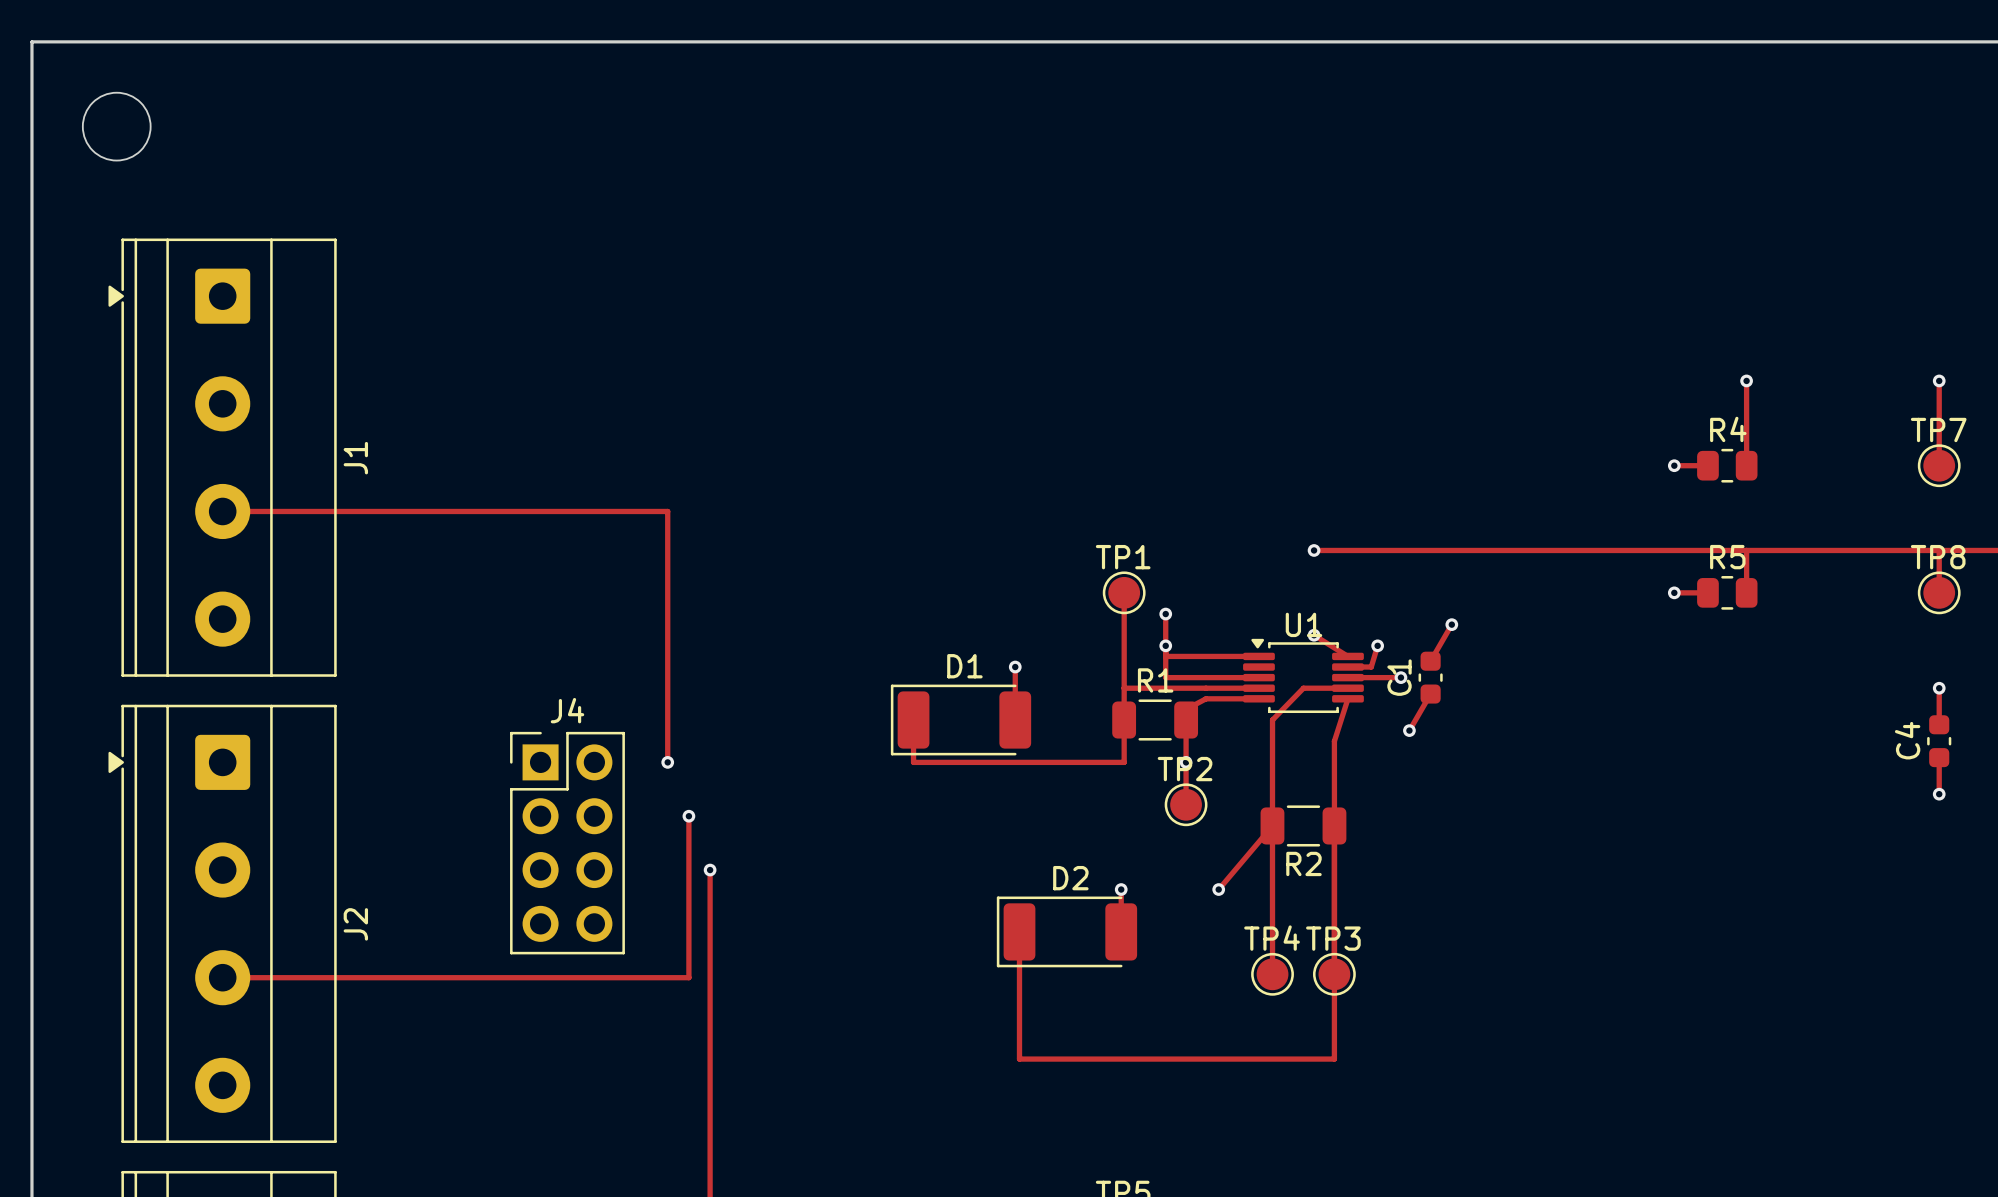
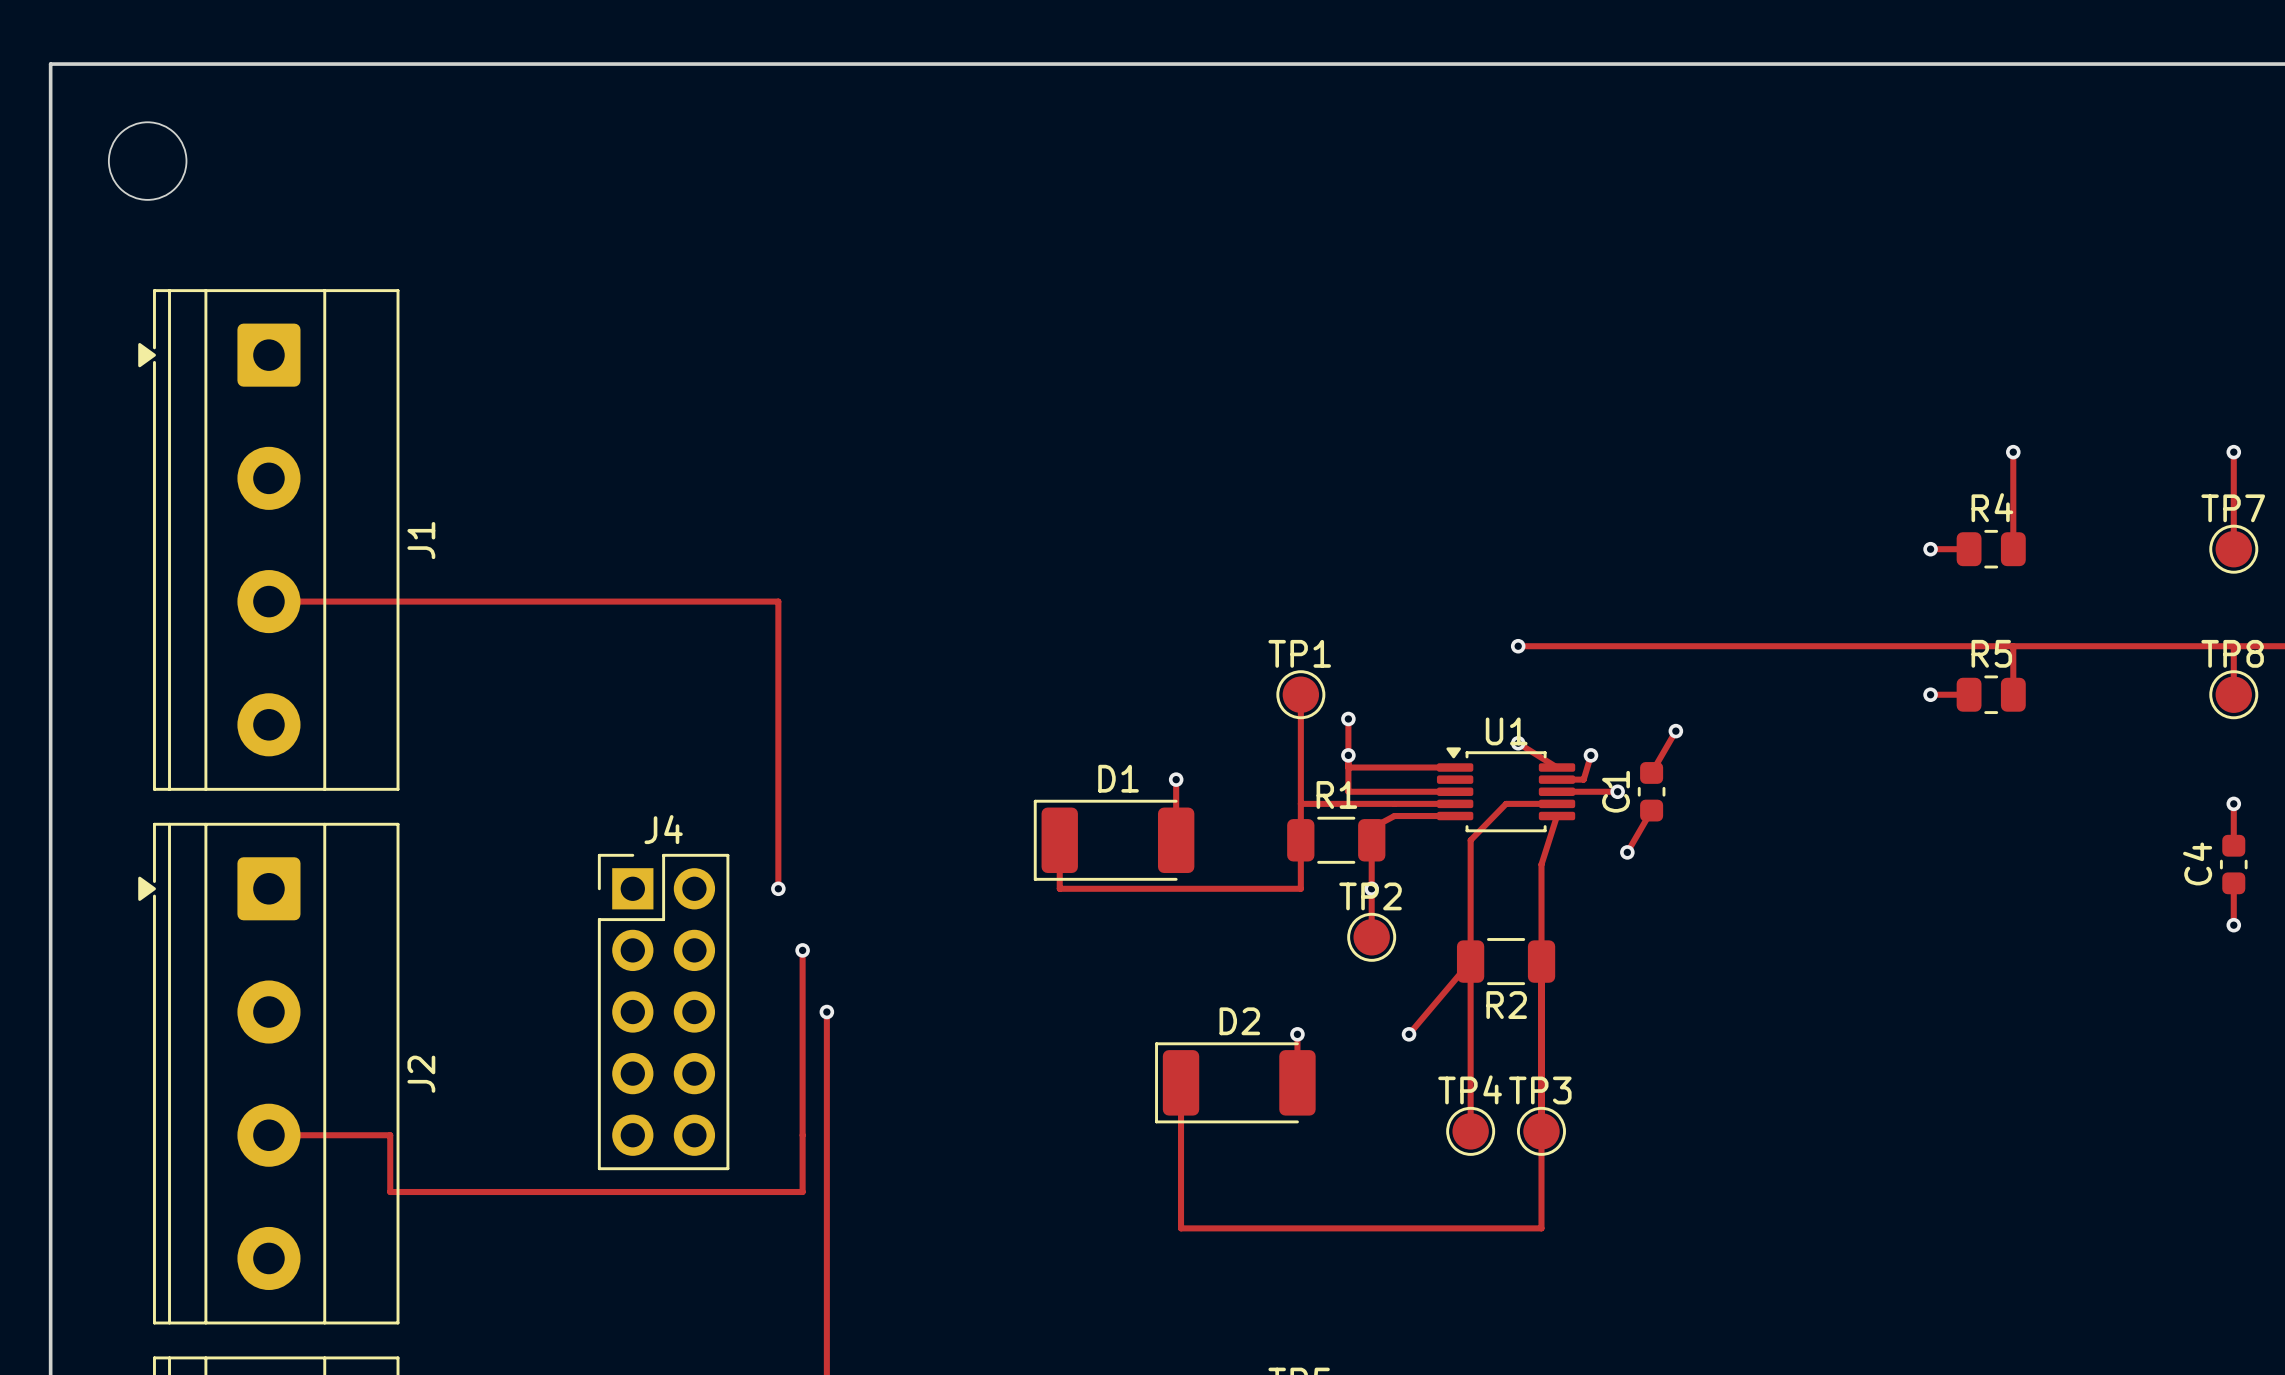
J4 footprint: [510, 731, 625, 955] -> [597, 853, 730, 1171]
track: (328, 977) (688, 977) -> (390, 1135) (390, 1192) (802, 1192) (802, 1135)

